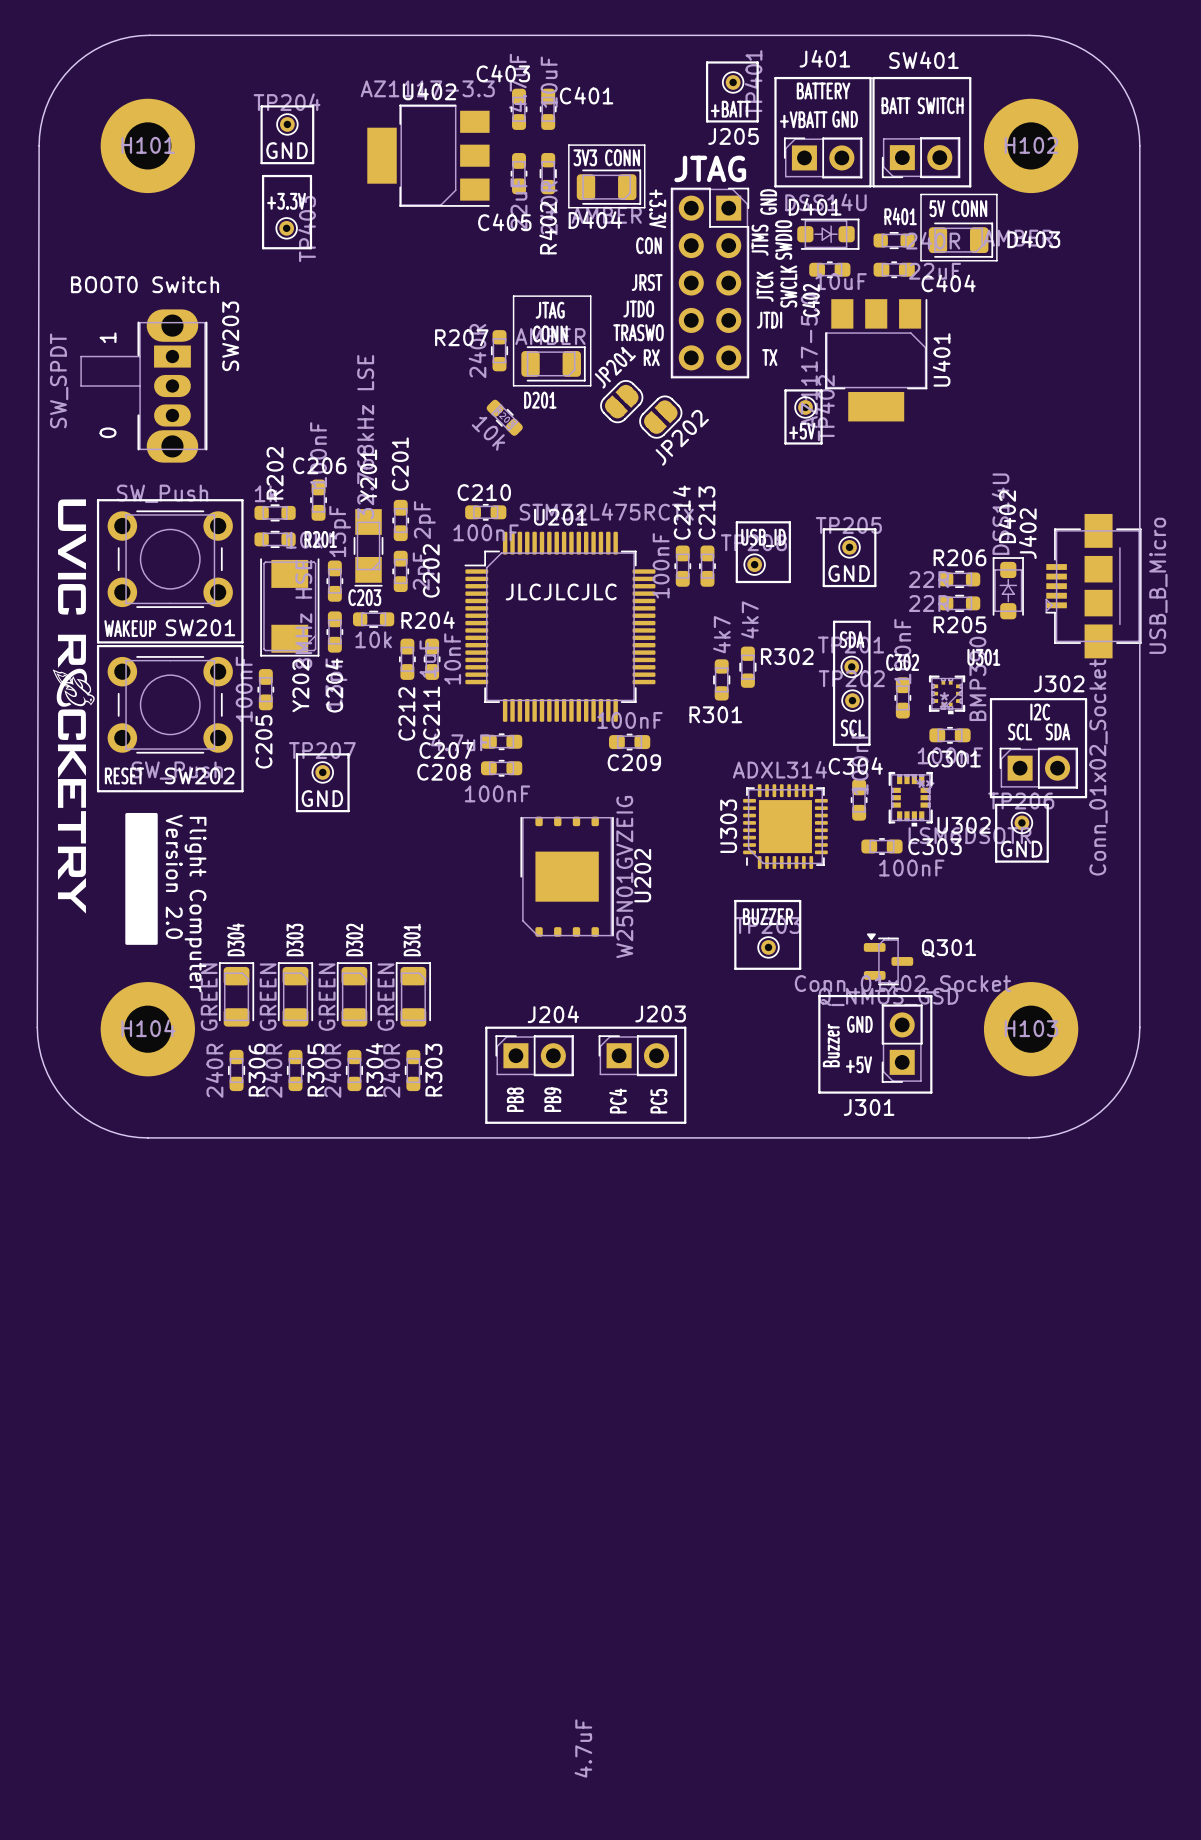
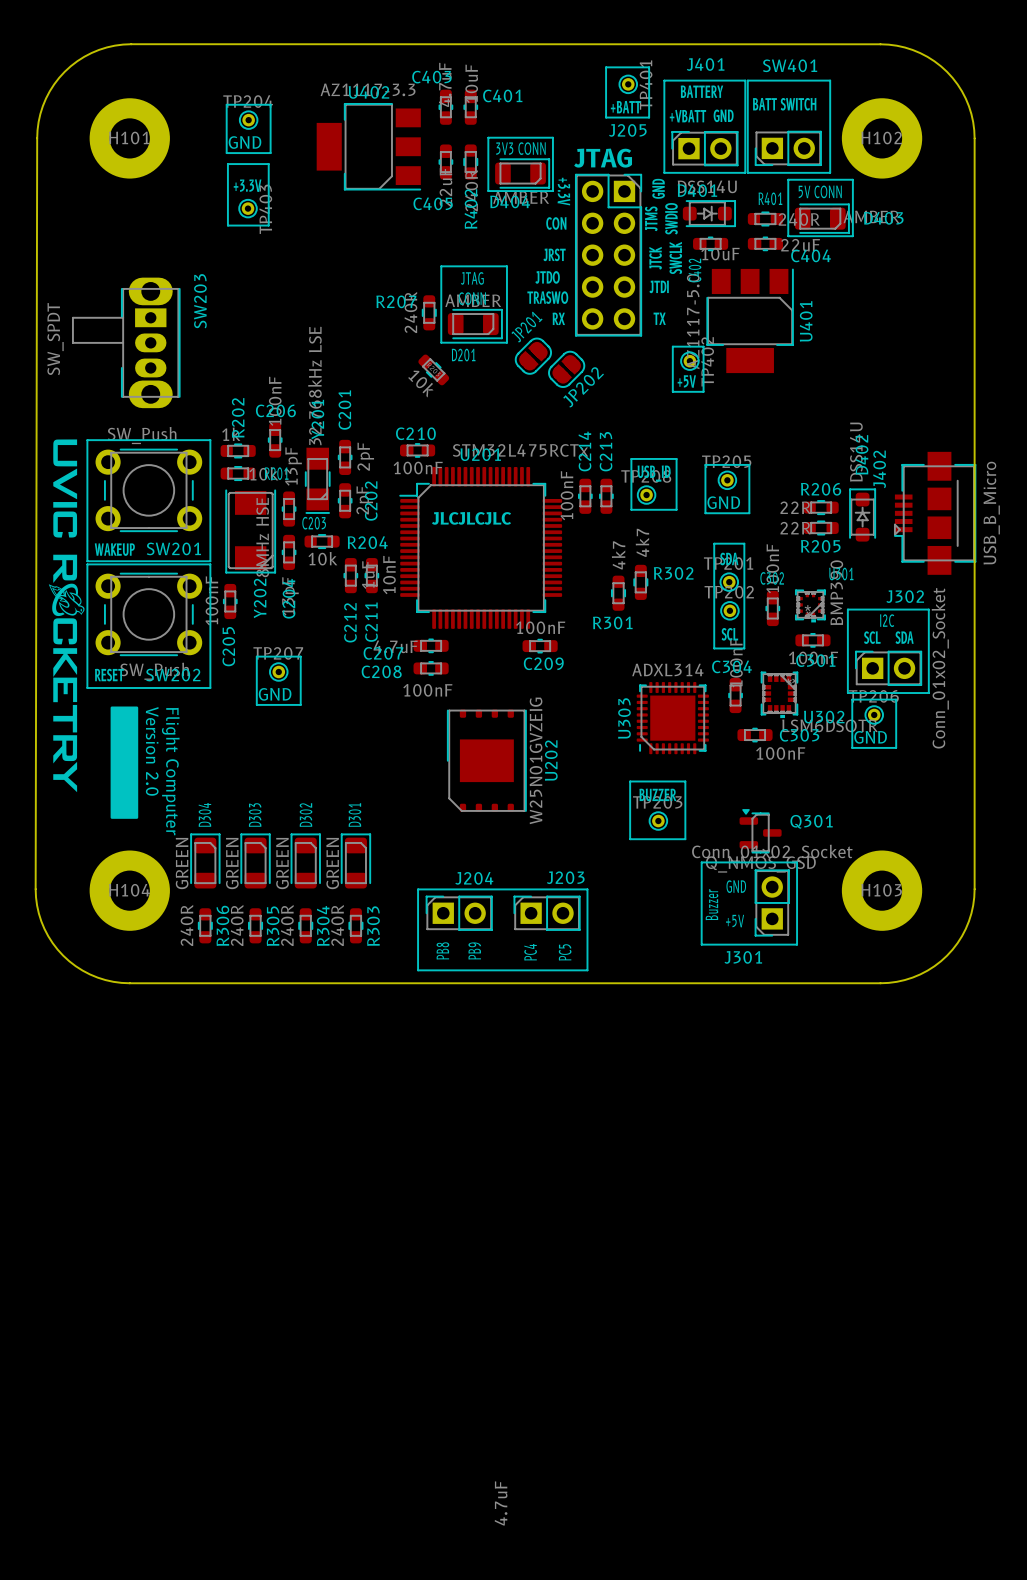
text: BOOT0 Switch (145, 284) -> none
text: 1 (108, 337) -> none
text: 0 (108, 432) -> none

